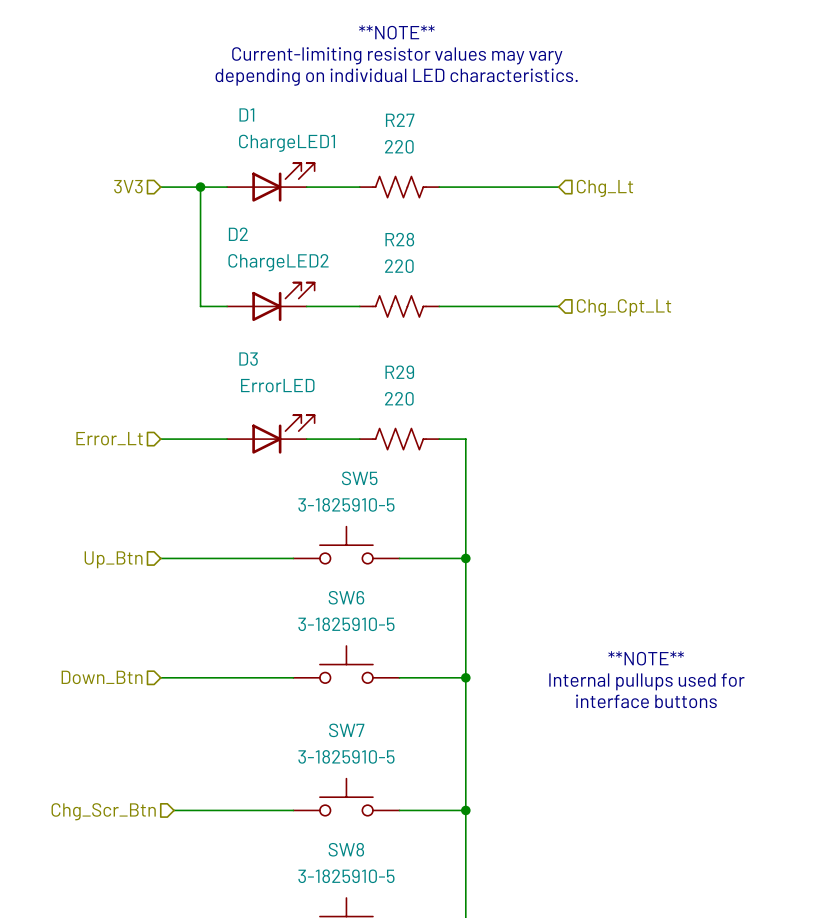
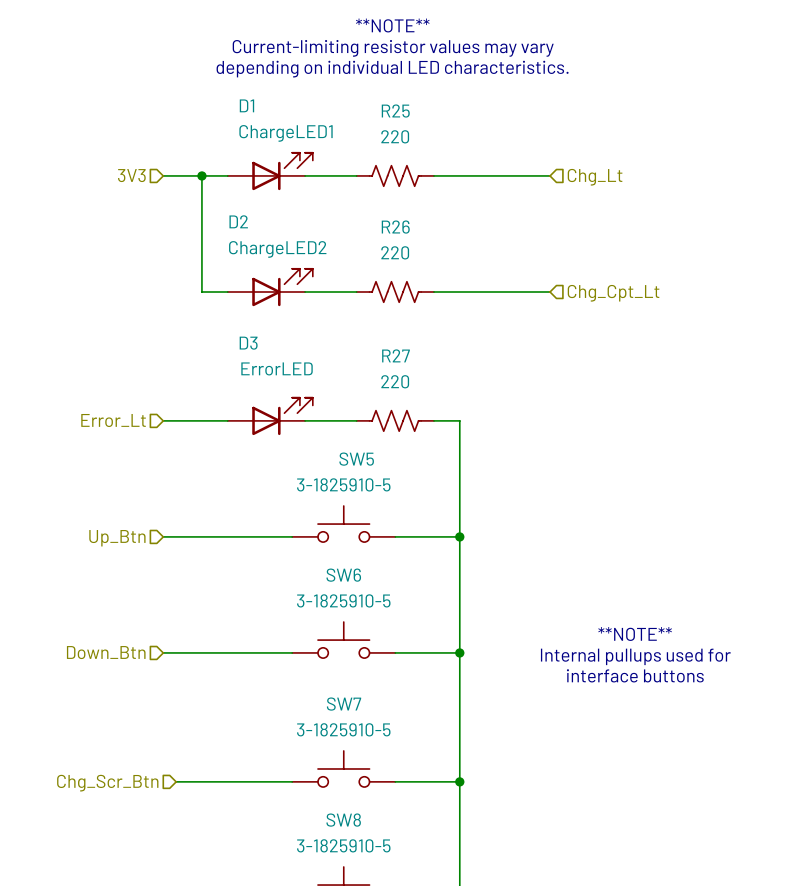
R27 name: R27 (400, 120) -> R25 (395, 111)
R28 name: R28 (399, 239) -> R26 (395, 227)
R29 name: R29 (399, 372) -> R27 (395, 355)

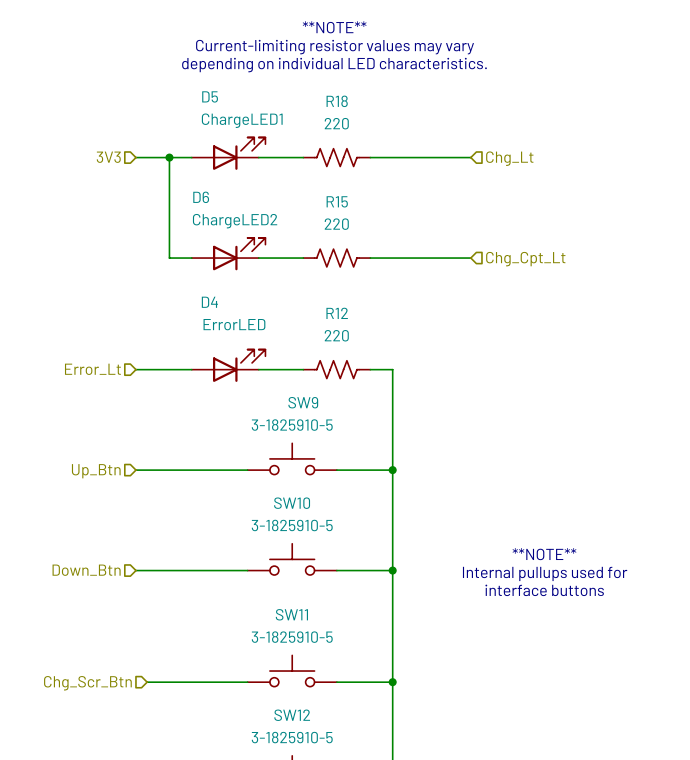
D1 name: D1 (246, 105) -> D5 (210, 96)
R25 name: R25 (395, 111) -> R18 (337, 101)
D2 name: D2 (238, 221) -> D6 (201, 197)
R26 name: R26 (395, 227) -> R15 (337, 201)
D3 name: D3 (248, 343) -> D4 (209, 302)
R27 name: R27 (395, 355) -> R12 (337, 313)
SW5 name: SW5 (356, 459) -> SW9 (303, 402)
SW6 name: SW6 (343, 575) -> SW10 (292, 503)
SW7 name: SW7 (344, 704) -> SW11 (291, 614)
SW8 name: SW8 (343, 820) -> SW12 (292, 715)

